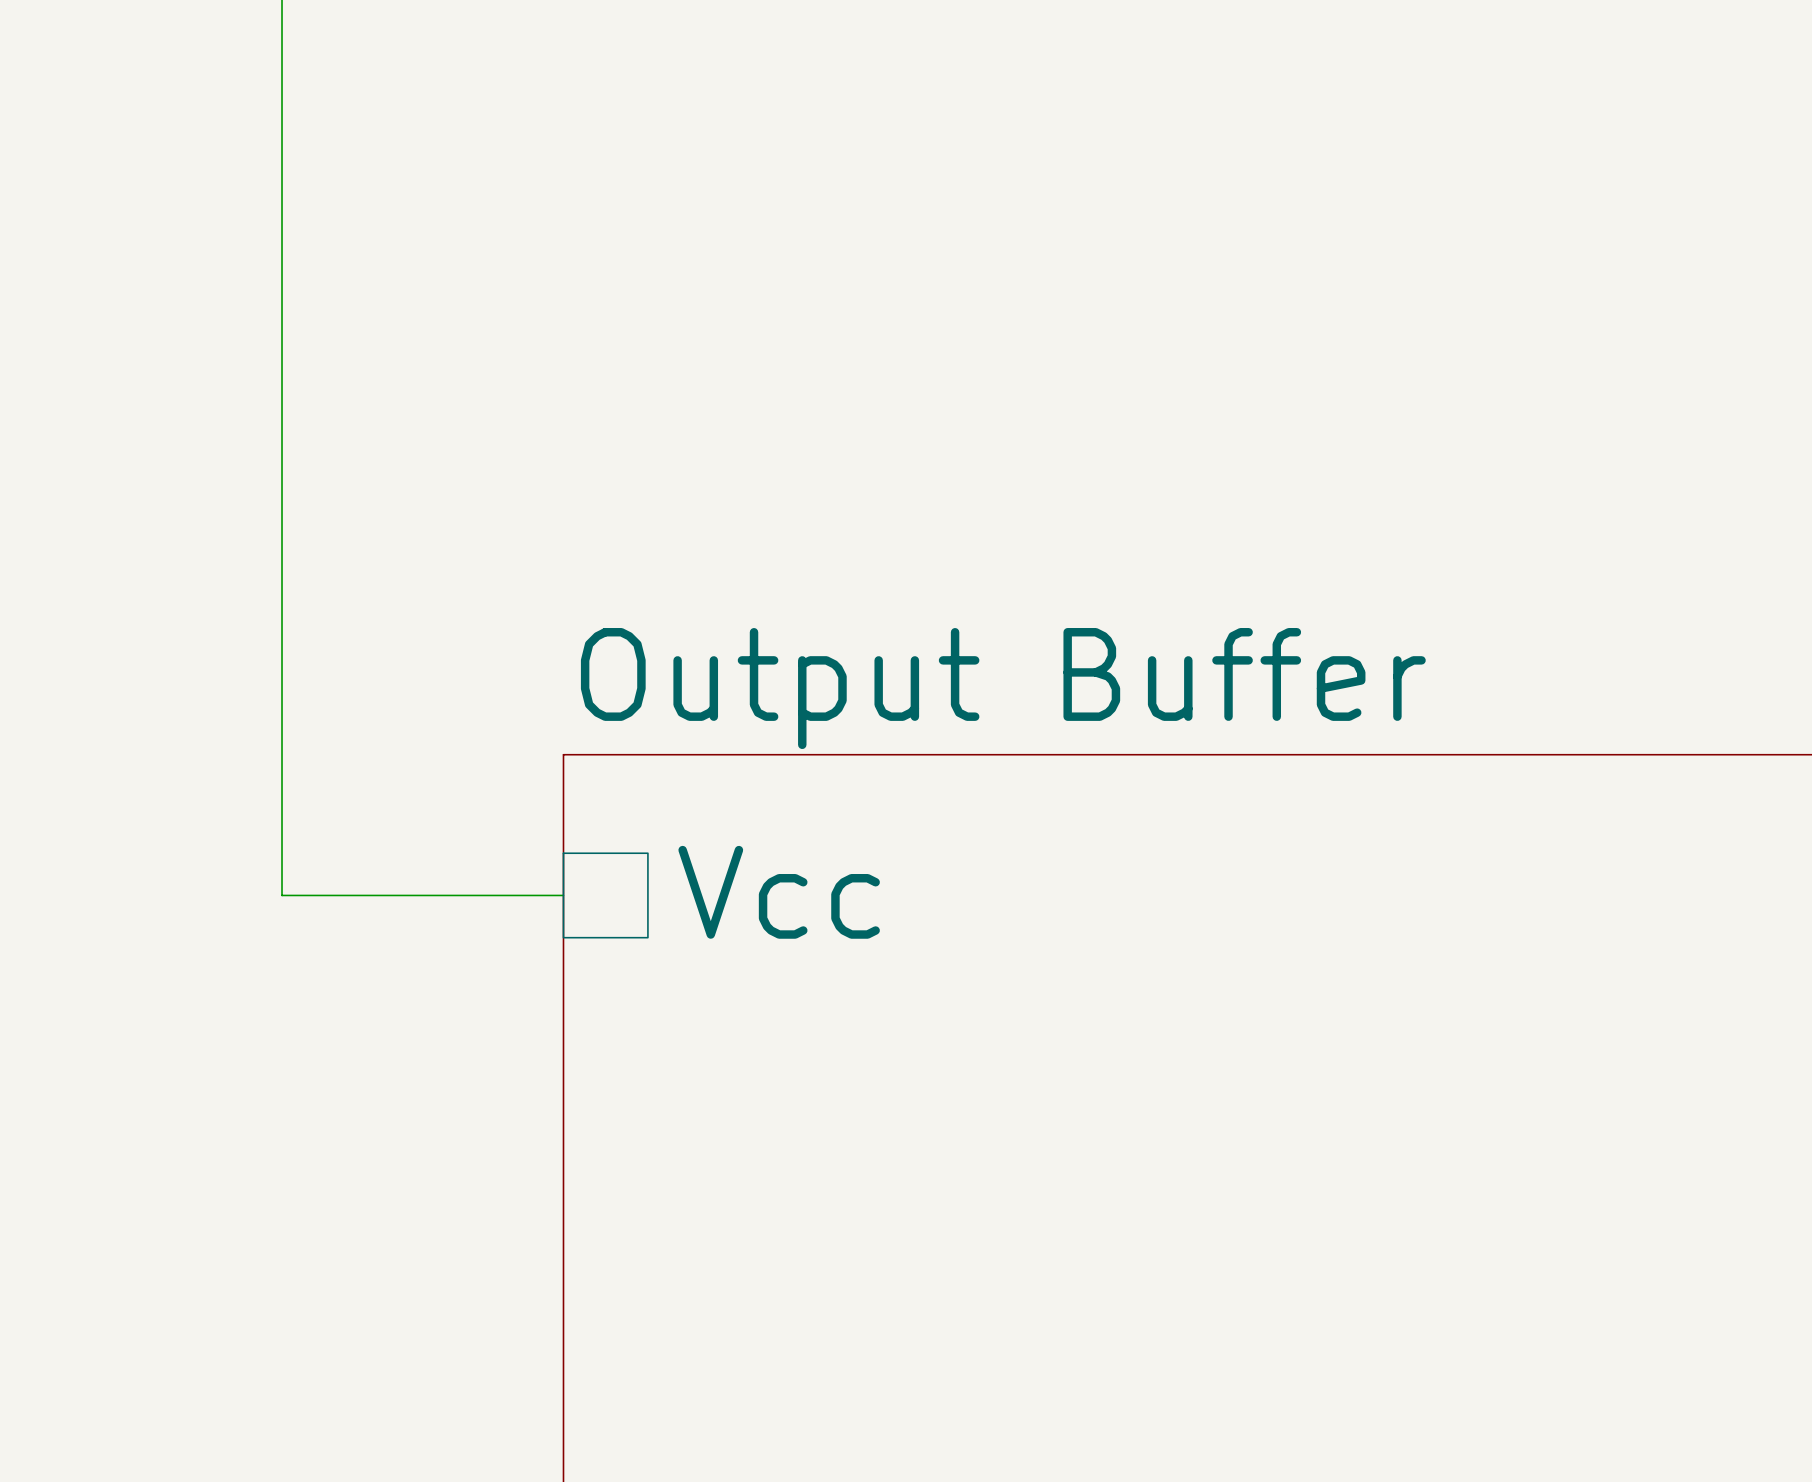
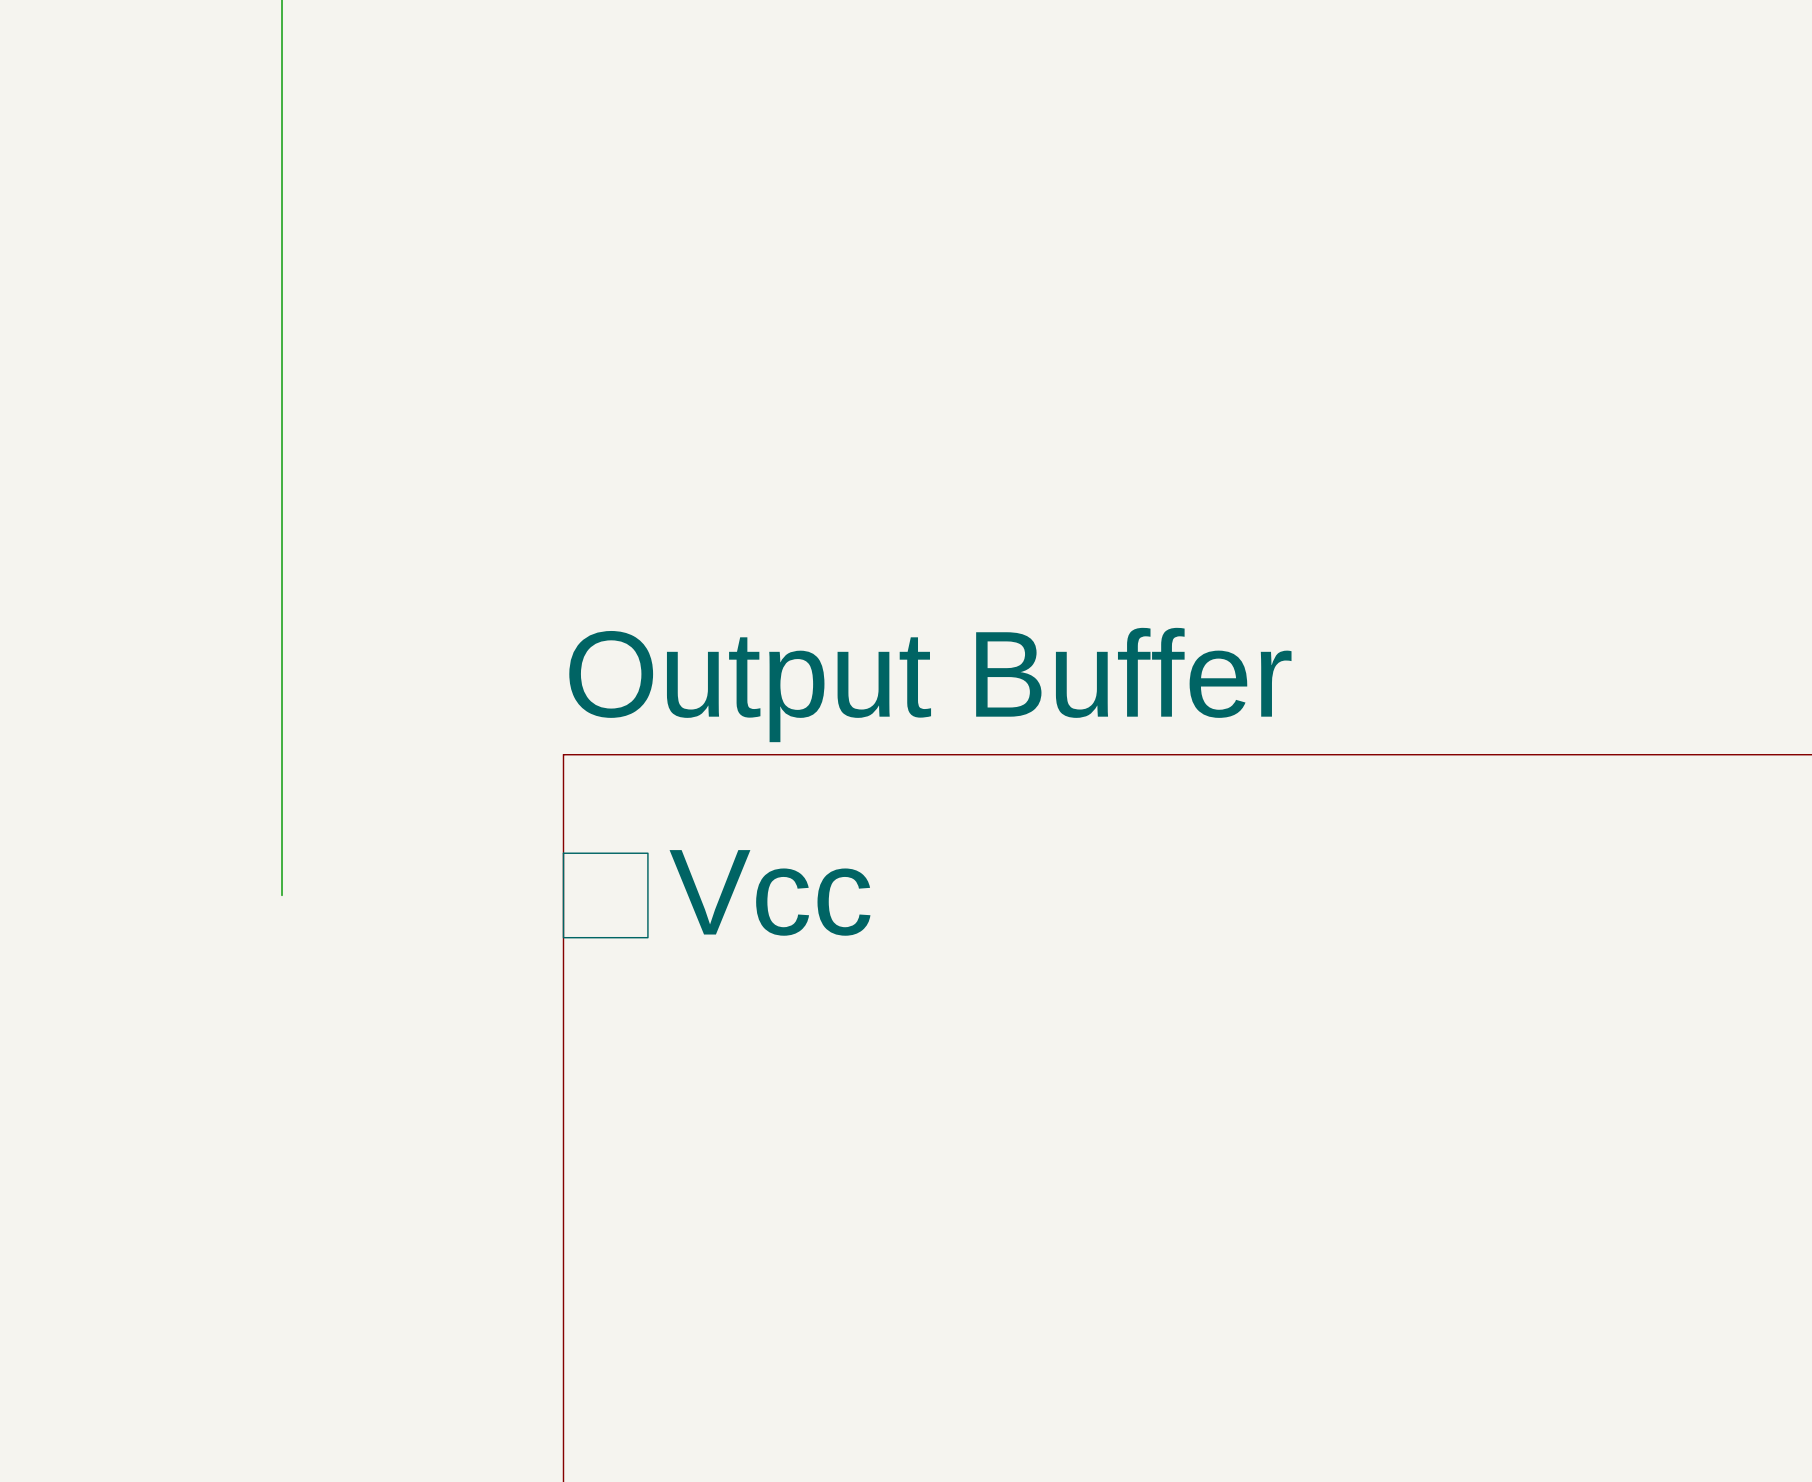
wire: (282, 895) (563, 895) -> none

